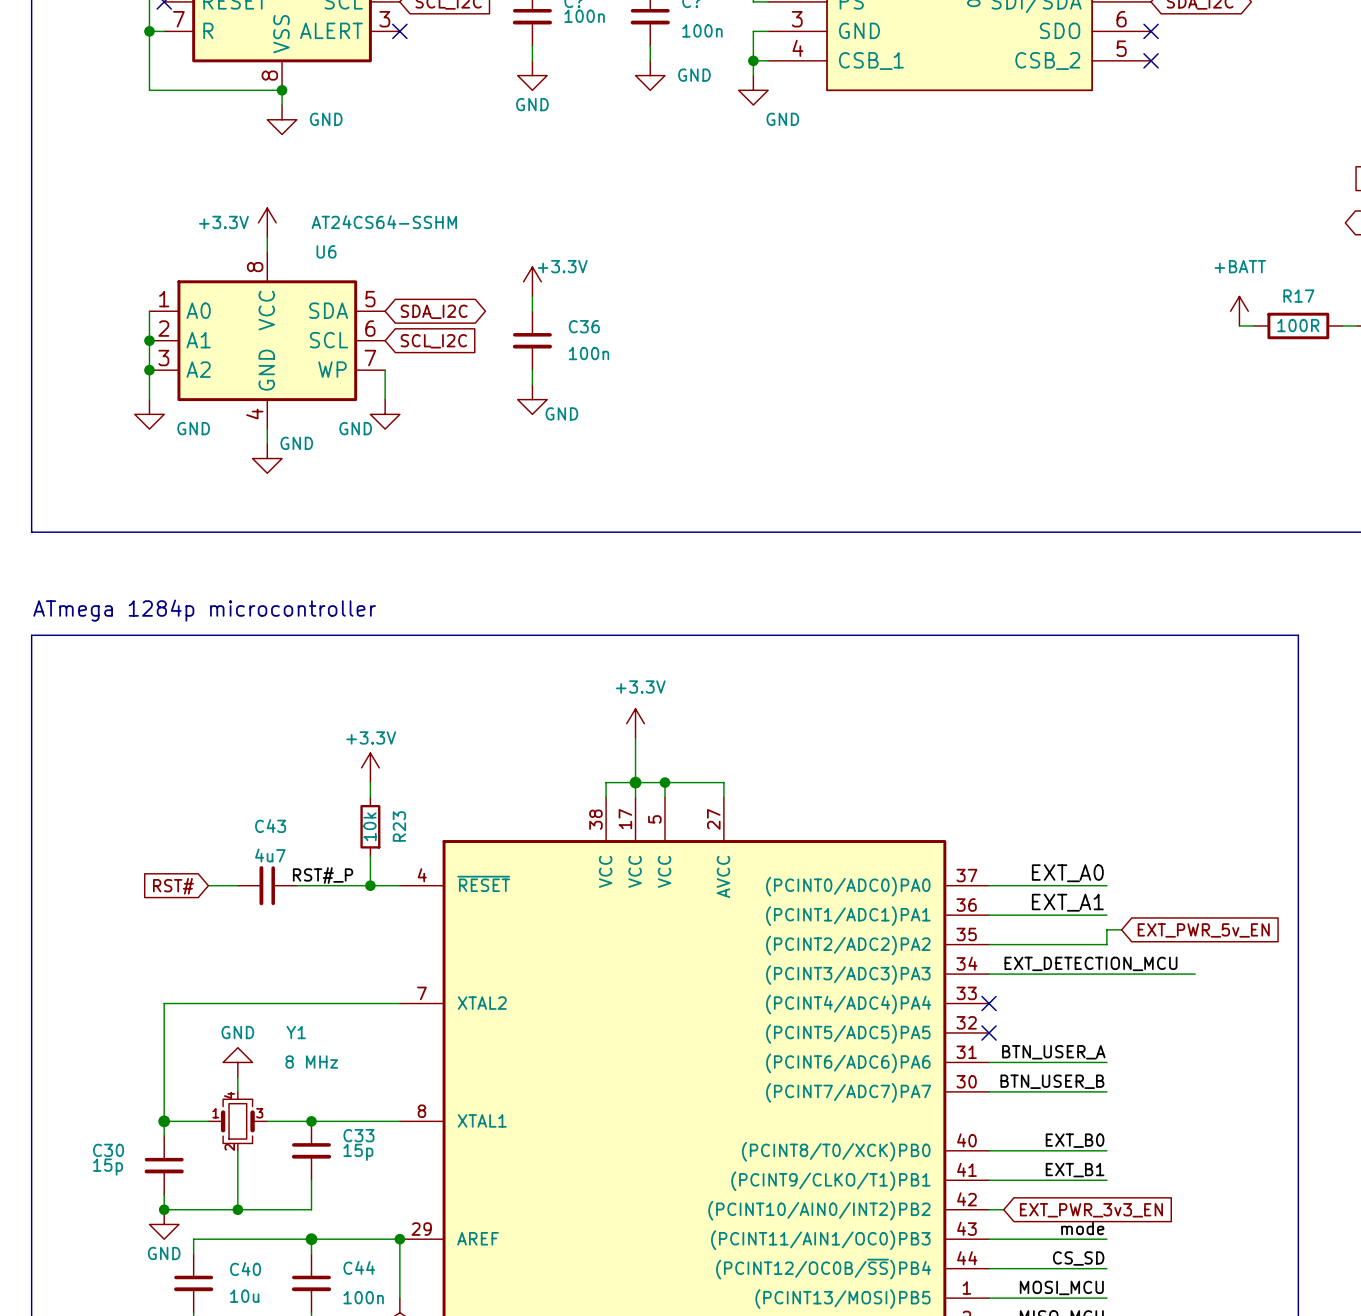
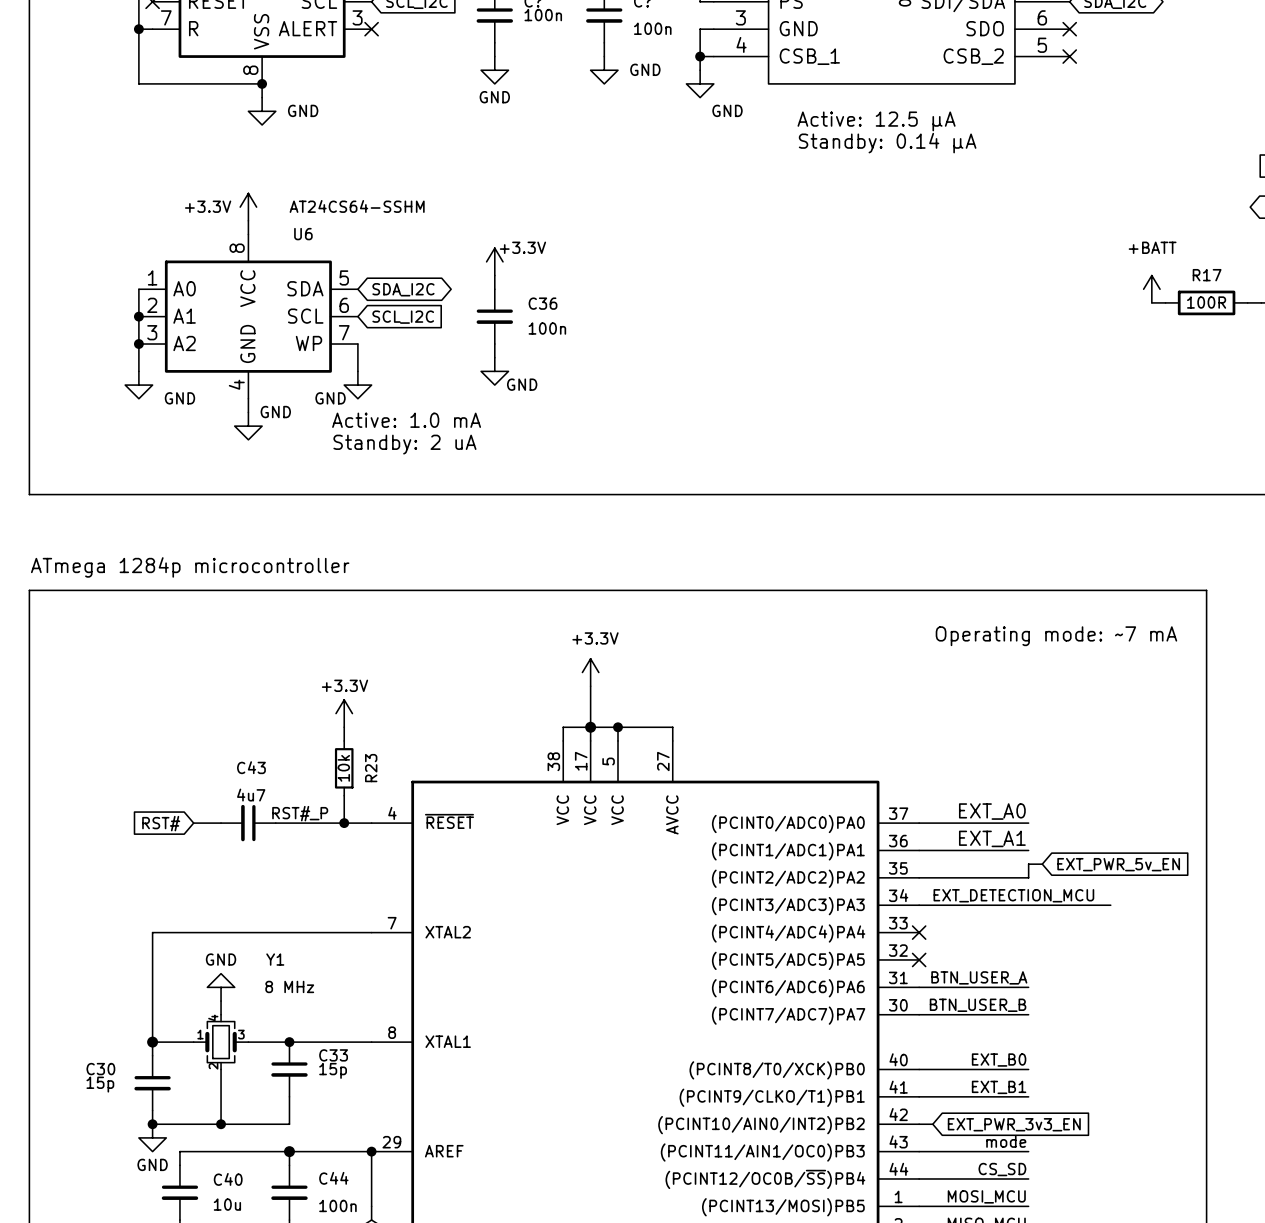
text: none -> Active: 12.5 μA (876, 121)
text: none -> Standby: 0.14 μA (887, 143)
text: none -> Active: 1.0 mA (406, 420)
text: none -> Standby: 2 uA (404, 444)
text: none -> Operating mode: ~7 mA (1056, 636)

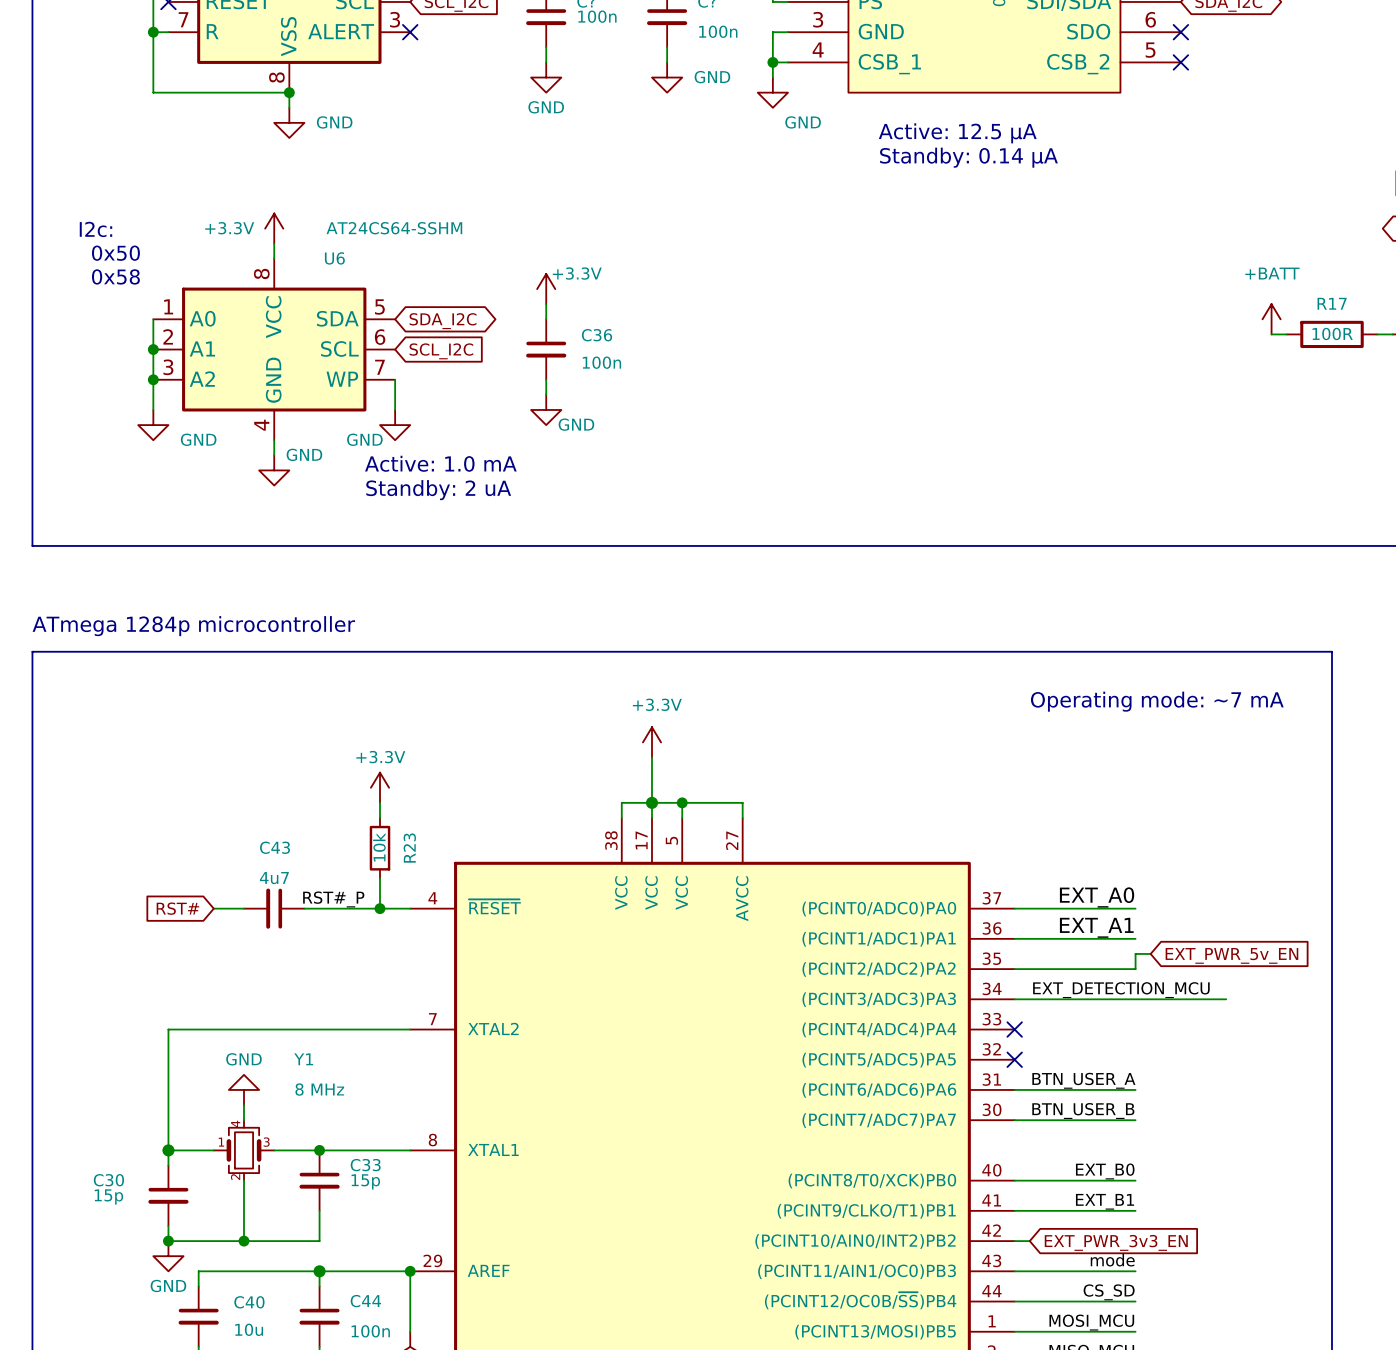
text: none -> I2c: (95, 229)
text: none -> 0x50 (115, 253)
text: none -> 0x58 (115, 276)

